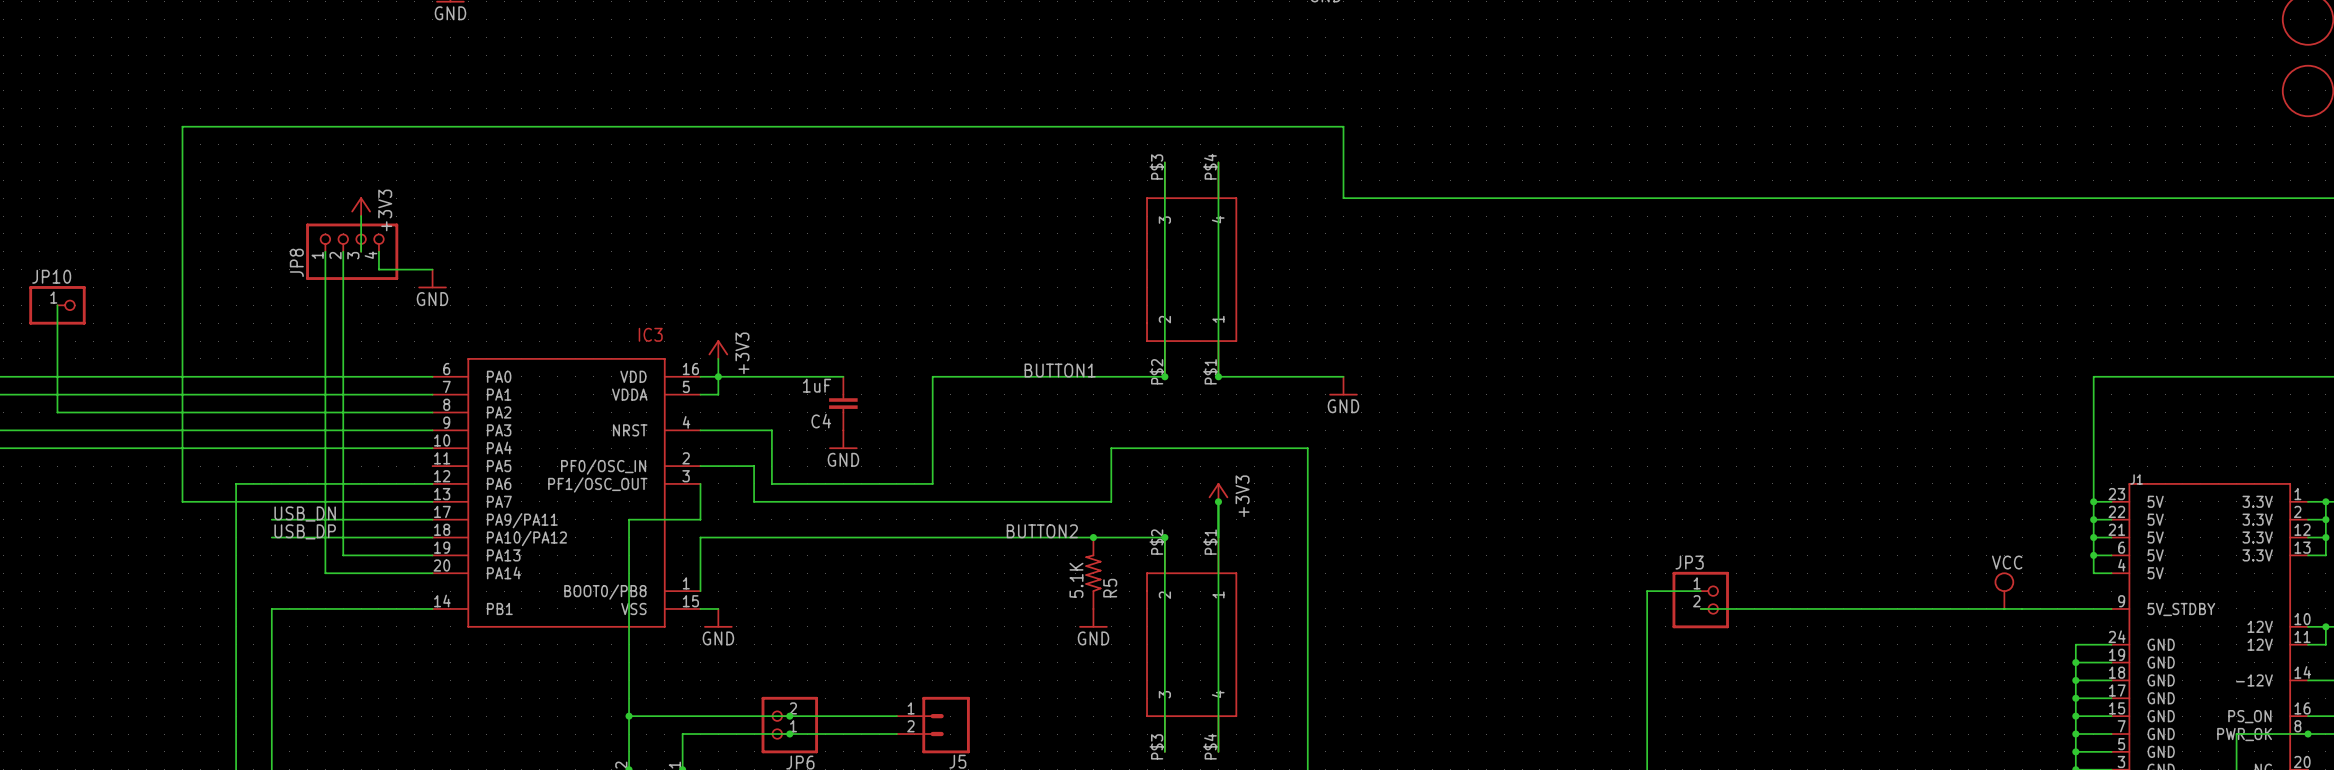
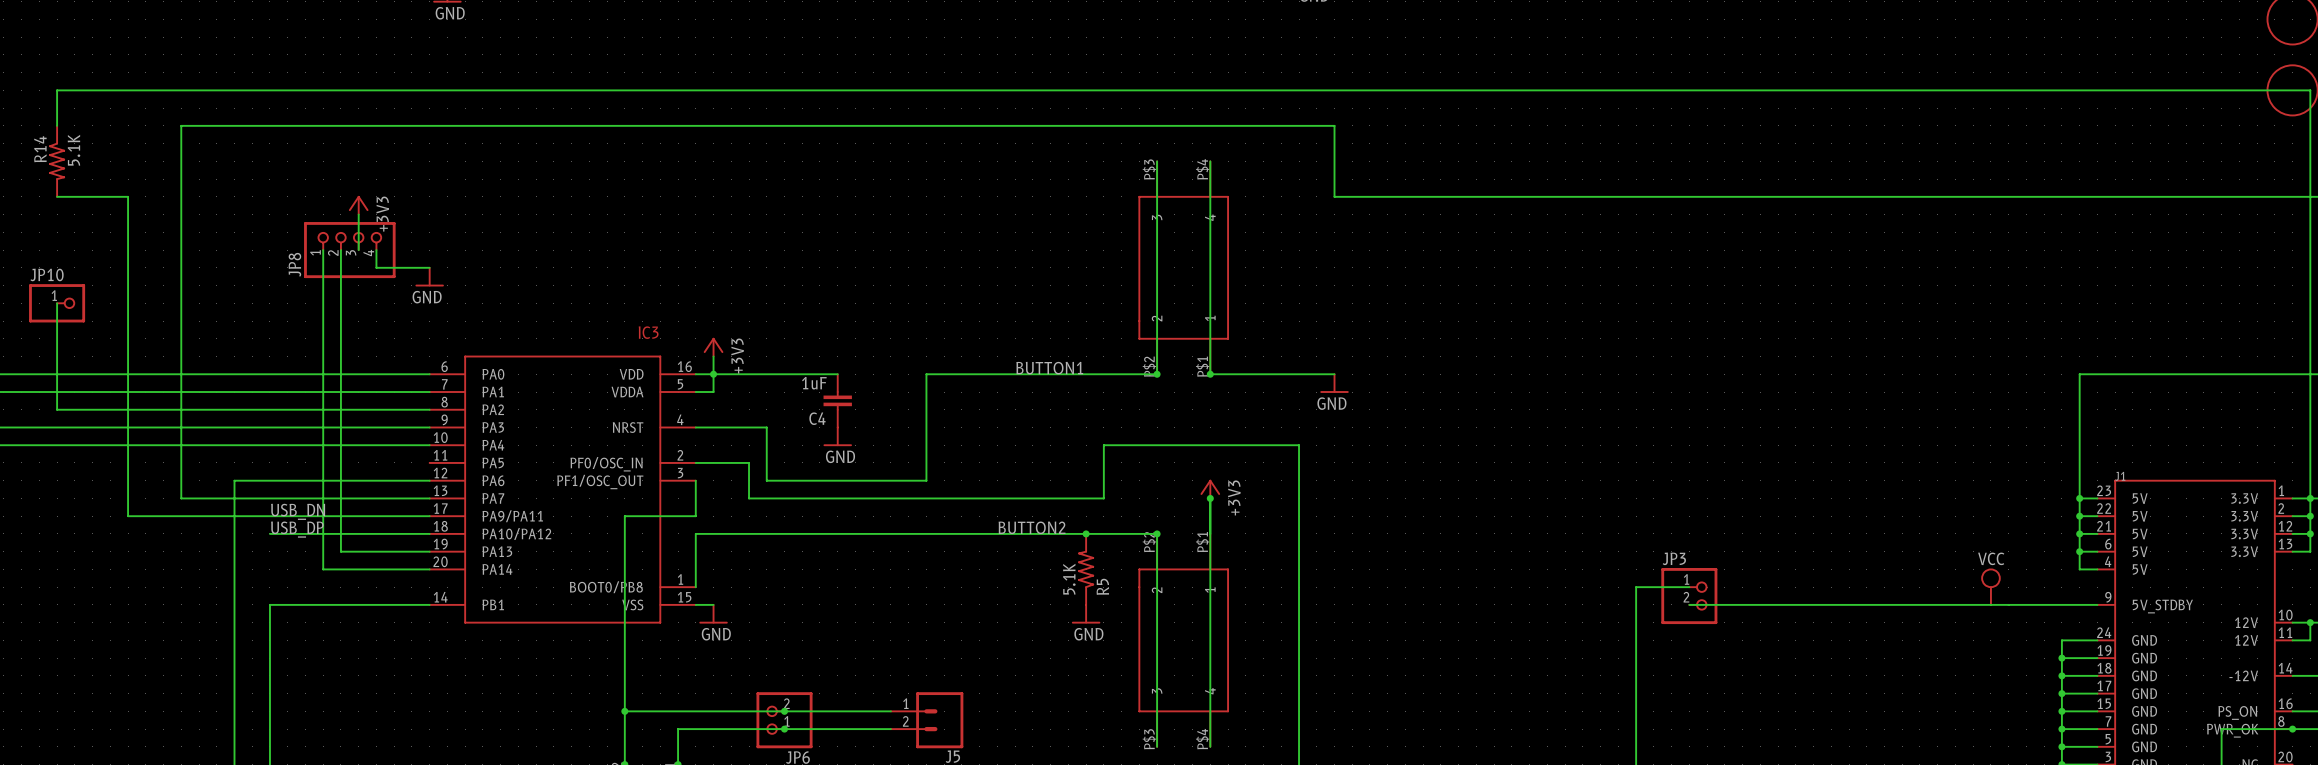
wire: none -> (57, 125) (57, 90) (2310, 90) (2310, 498)
R14: none -> 5.1K (57, 161)
wire: none -> (57, 196) (128, 196) (128, 516) (269, 516)

